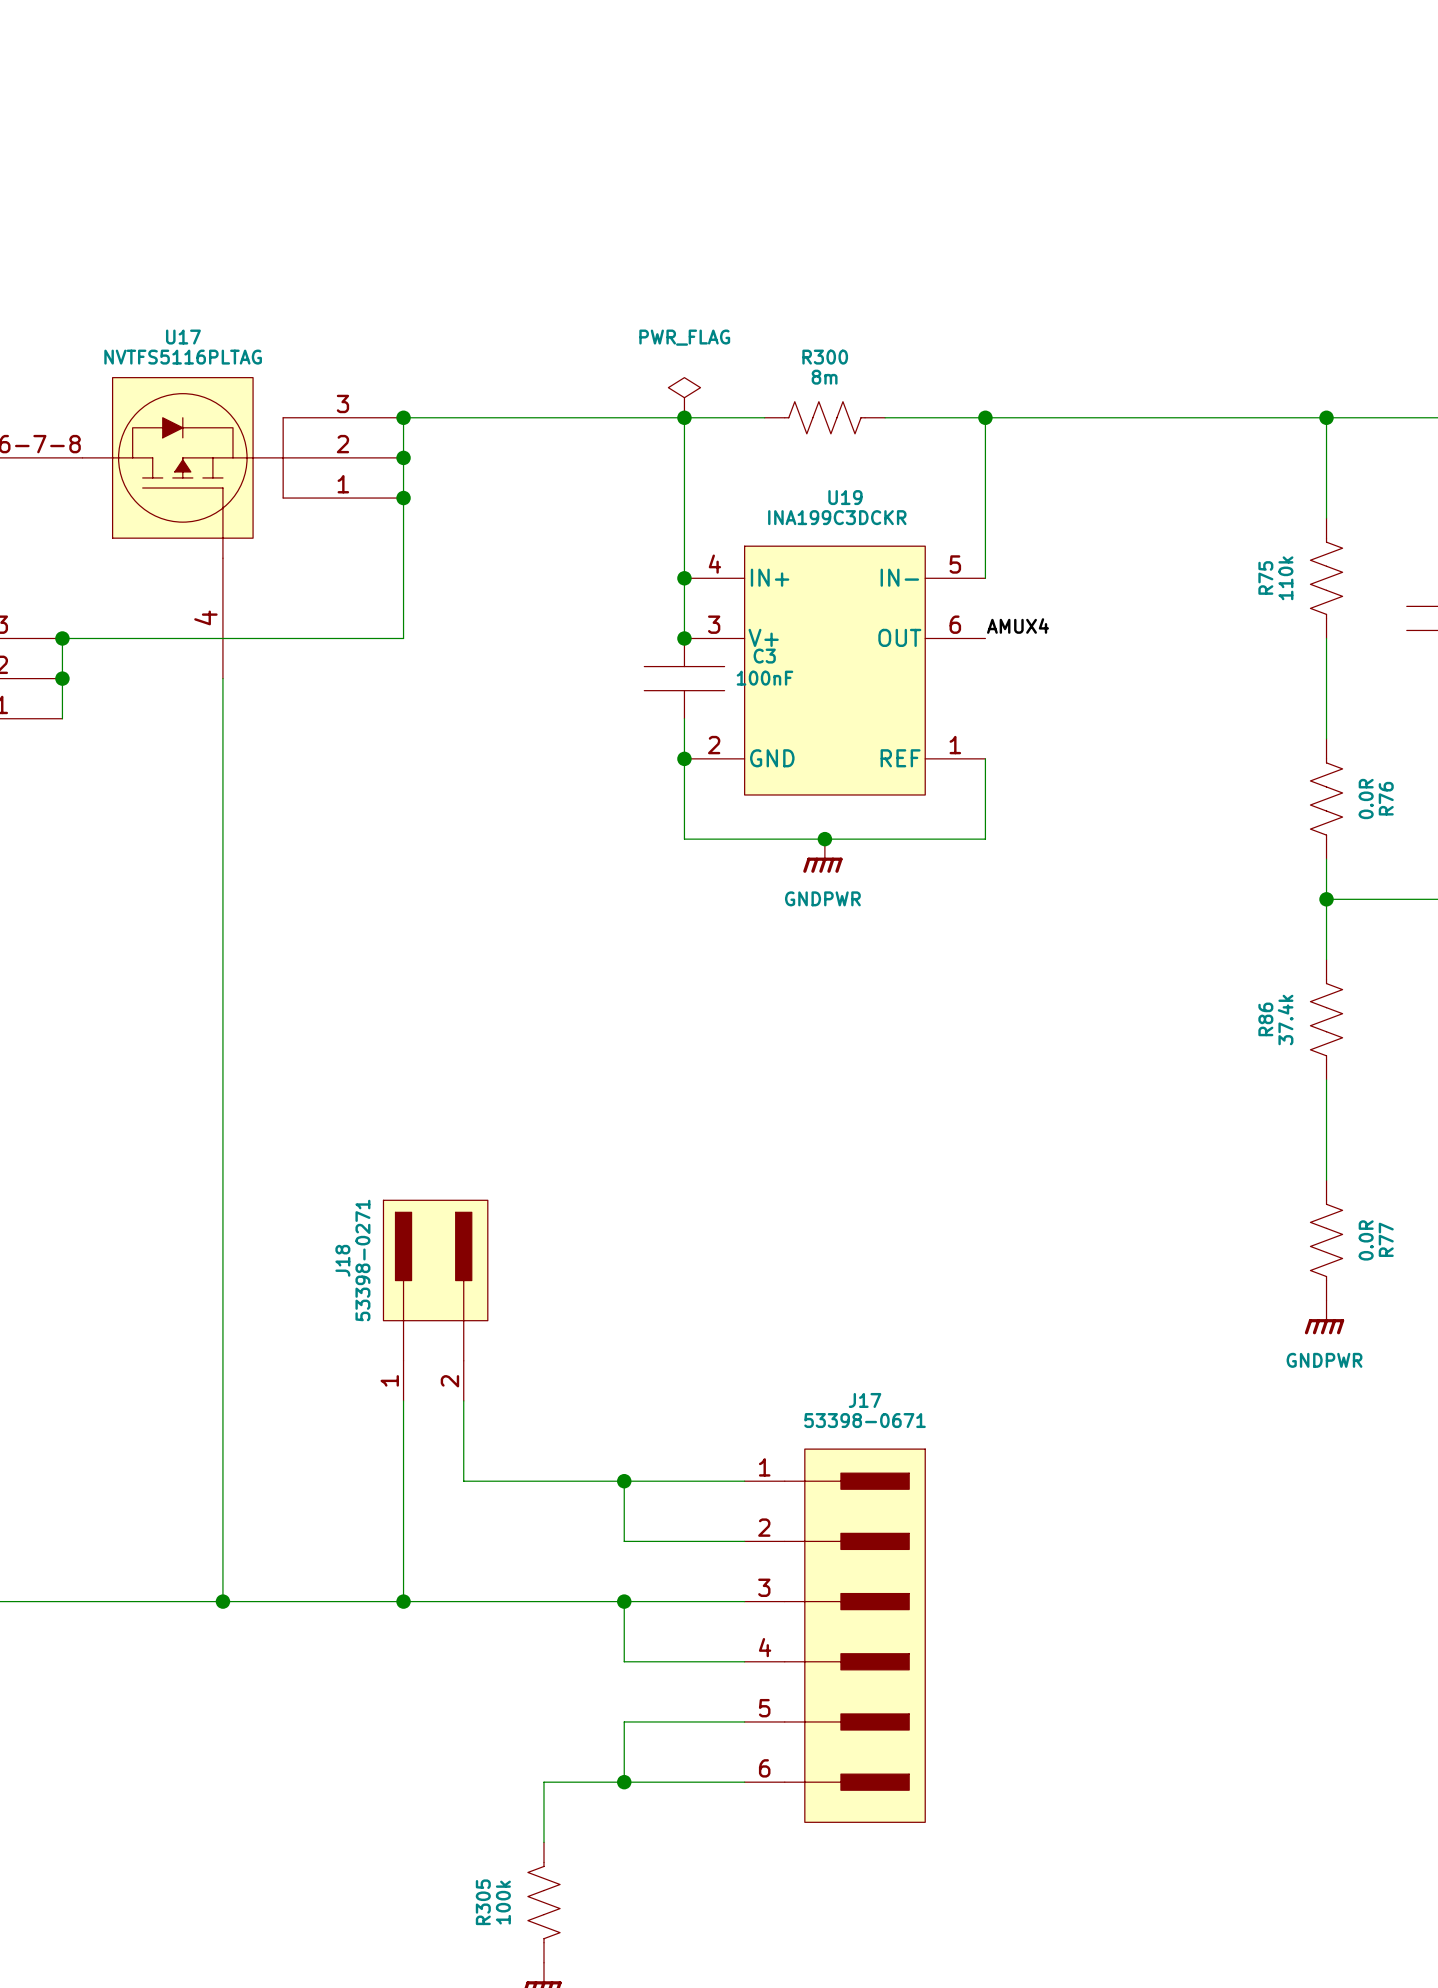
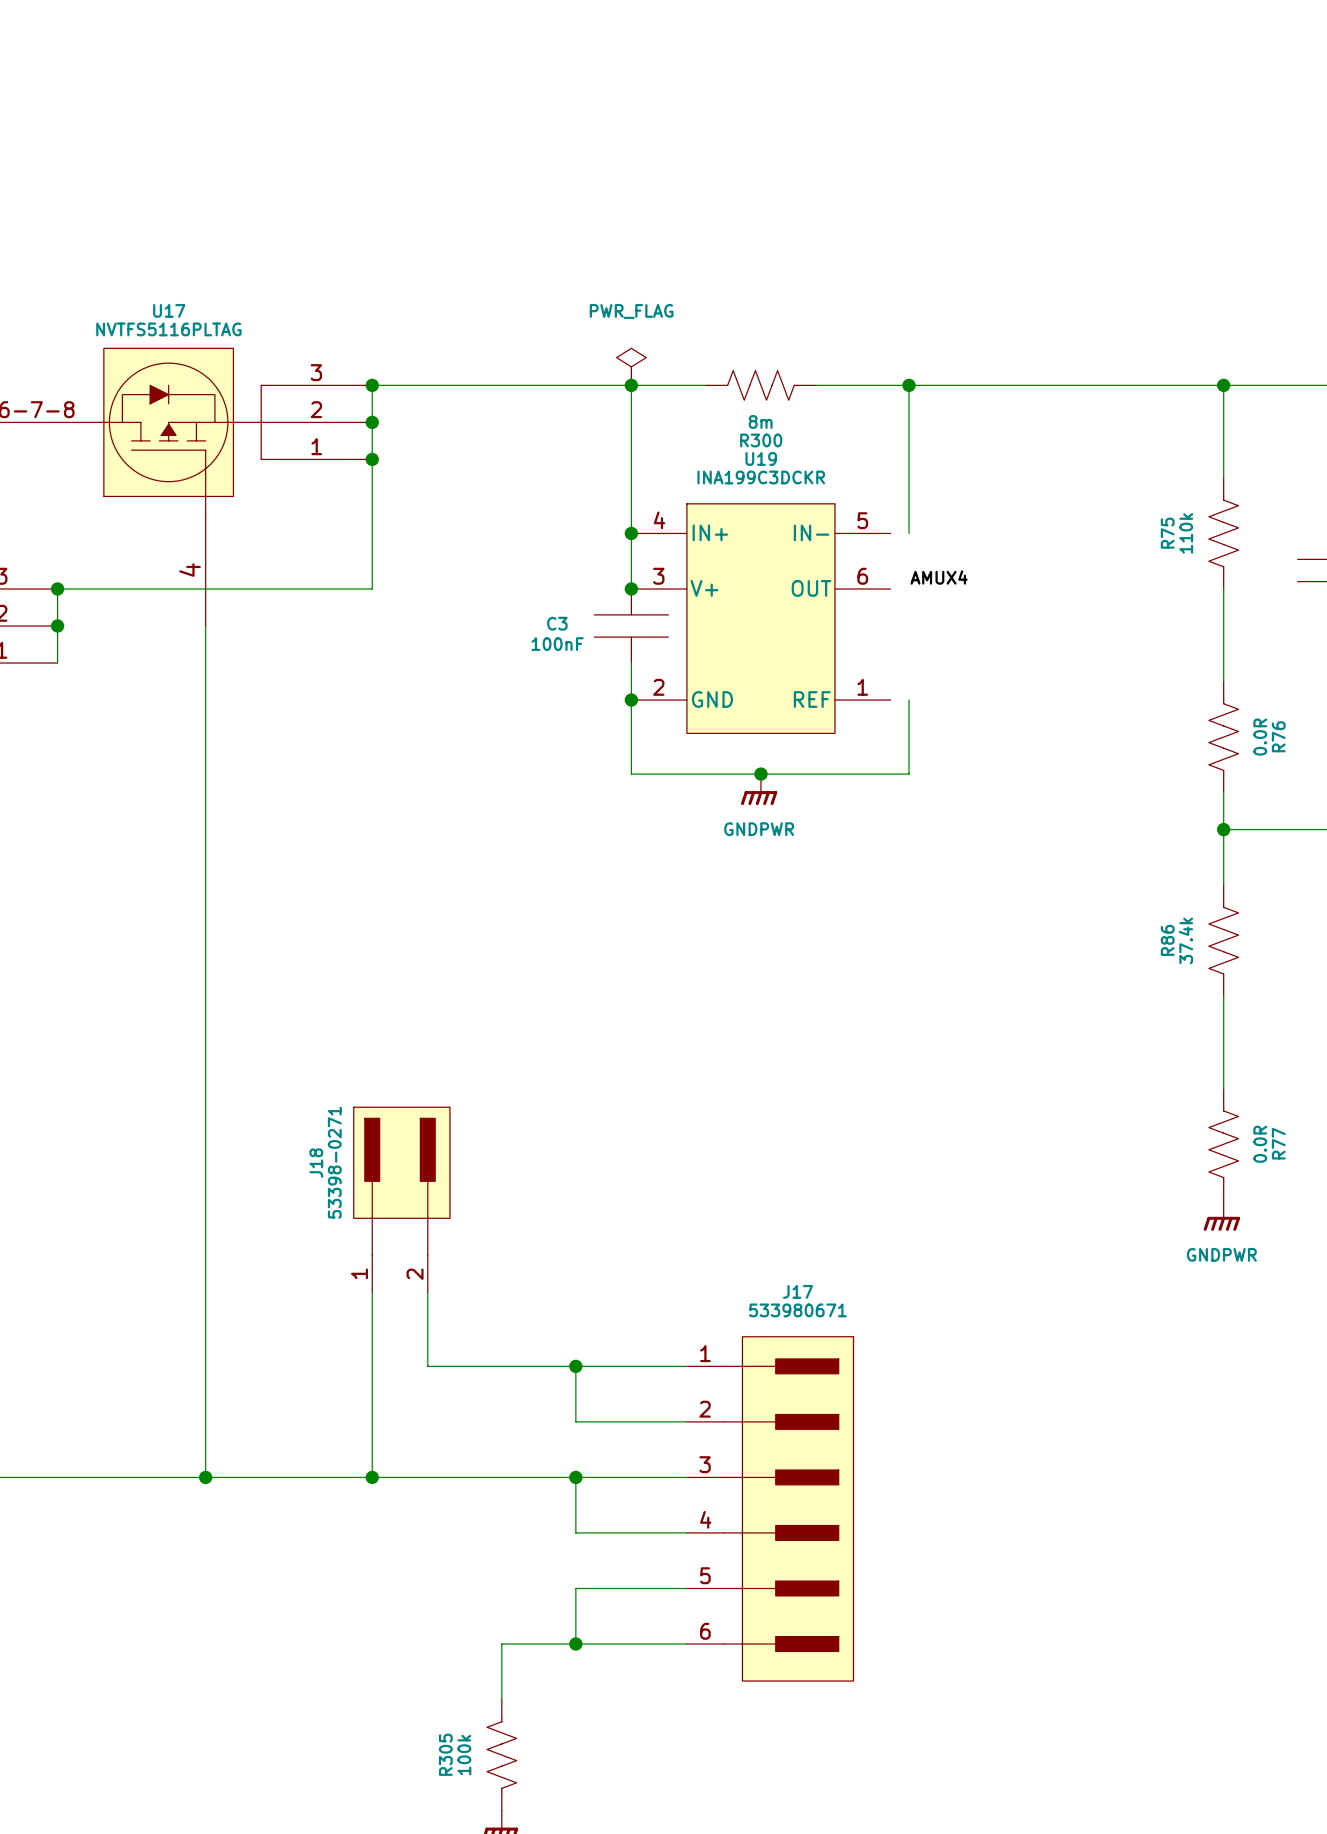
R300 name position: R300 (825, 357) -> R300 (761, 440)
R300 value position: 8m (824, 377) -> 8m (760, 421)
U19 symbol: [684, 546, 986, 795] -> [631, 503, 891, 734]
C3 name position: C3 (764, 656) -> C3 (557, 623)
C3 value position: 100nF (765, 678) -> 100nF (557, 644)
J17 value: 53398-0671 (865, 1420) -> 533980671 (797, 1310)

